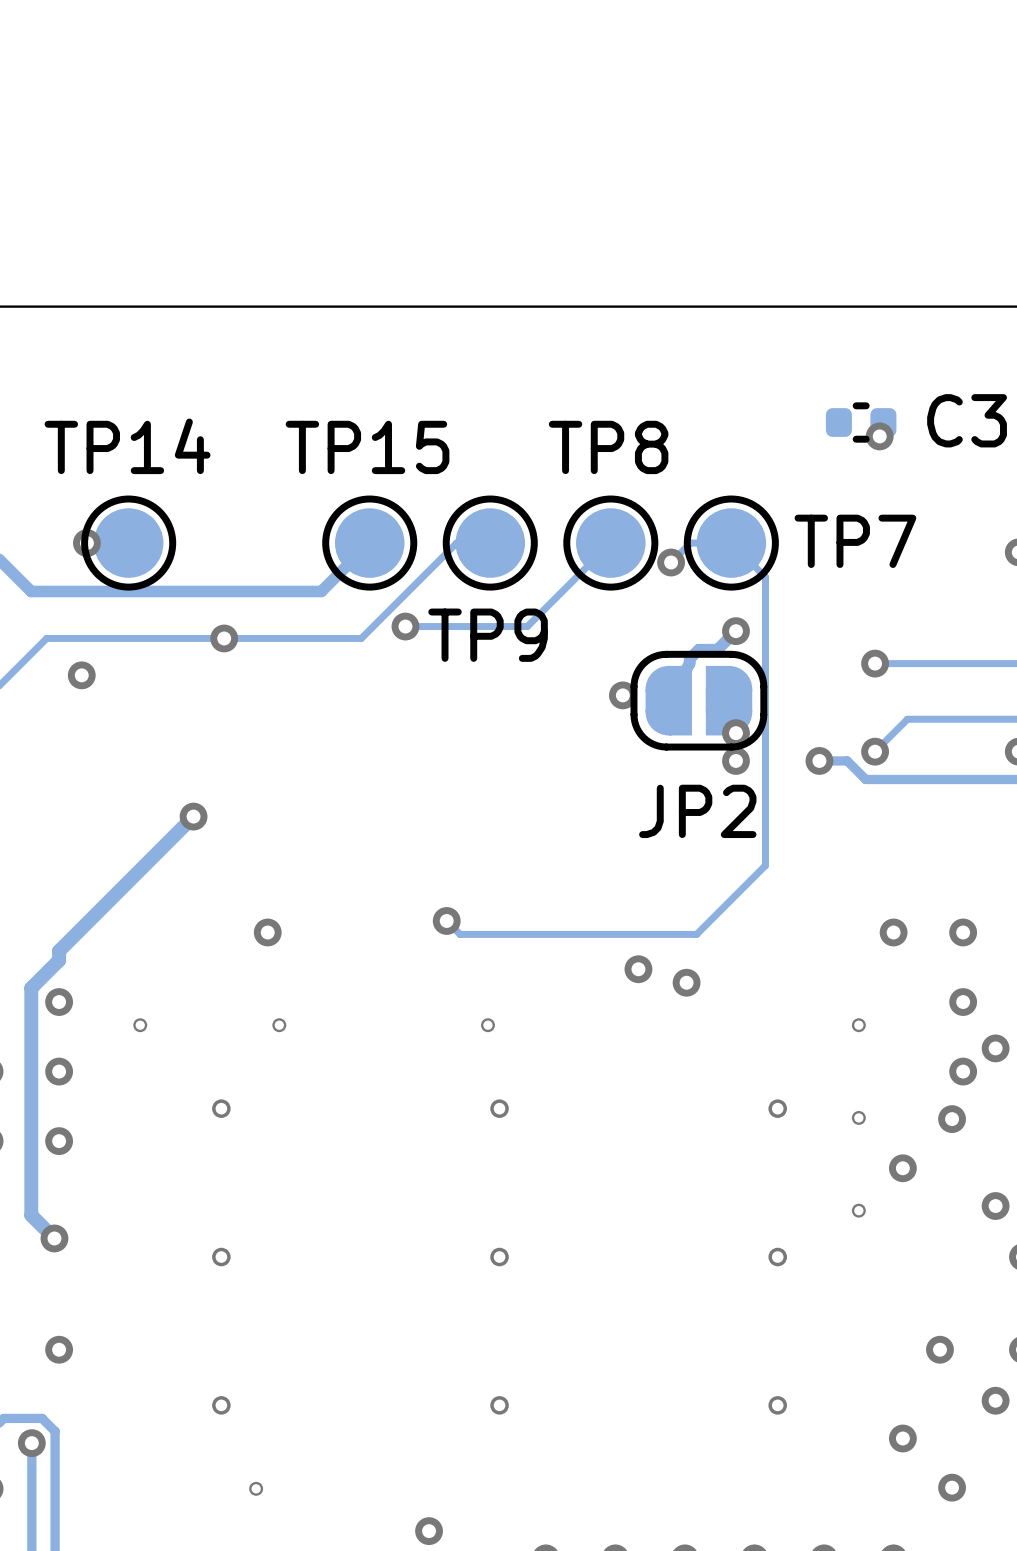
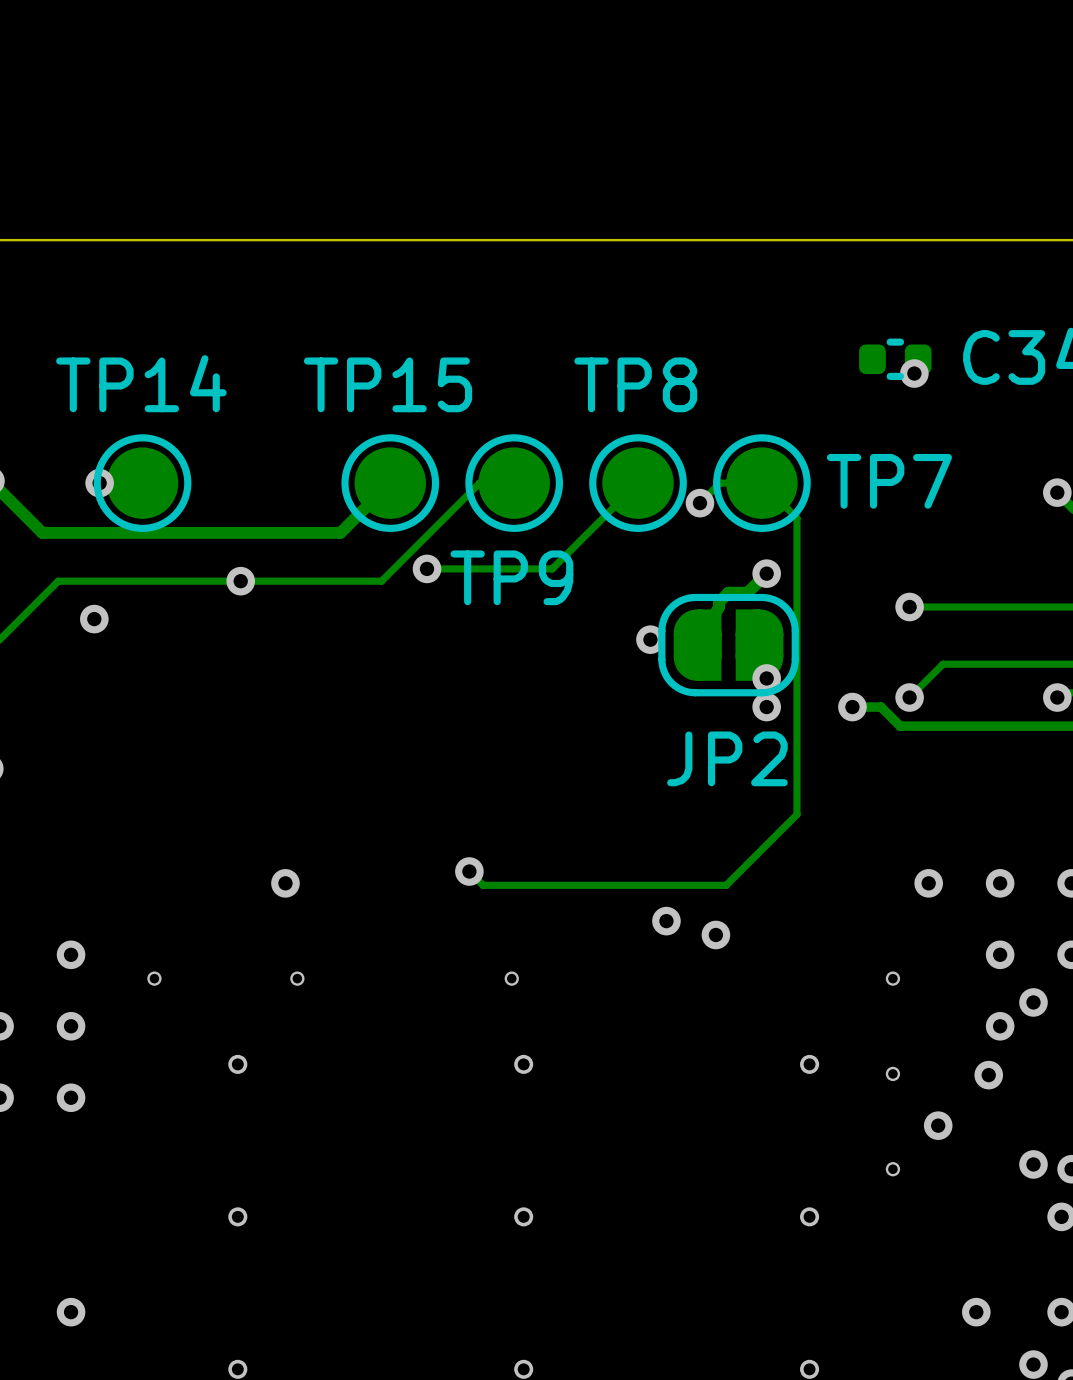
track: (193, 816) (59, 951) (59, 960) (31, 988) (31, 1215) (54, 1238) -> none
via: (193, 816) -> none
via: (54, 1238) -> none

